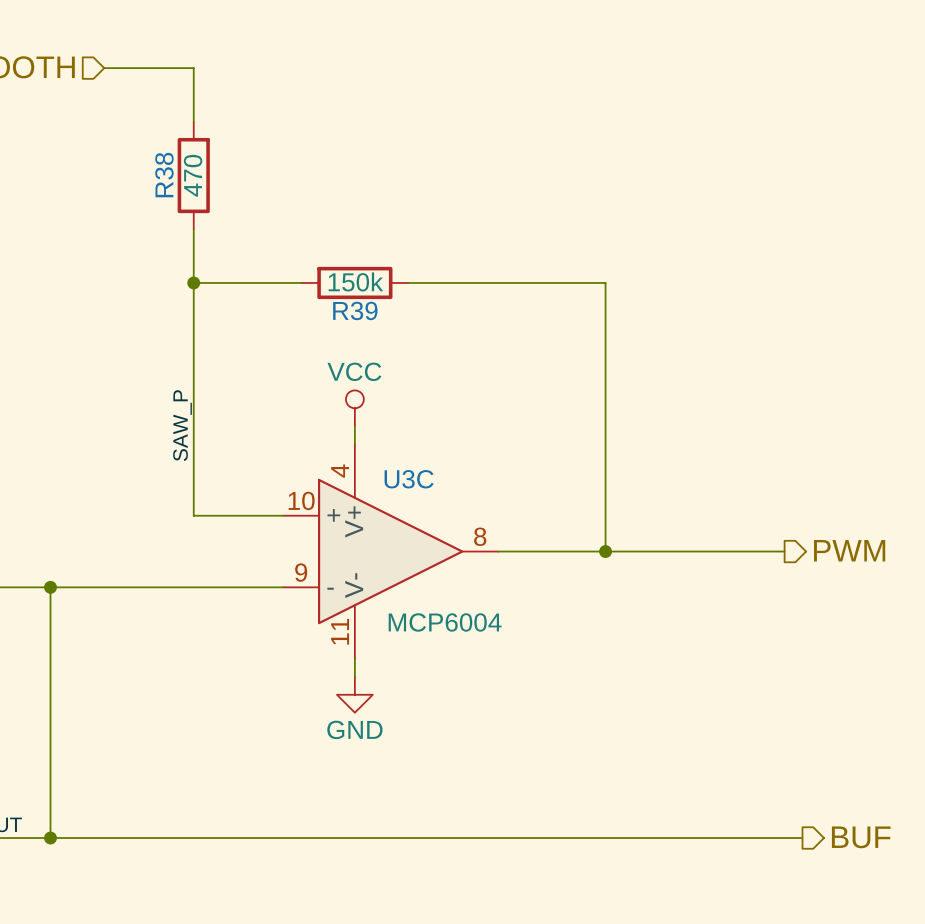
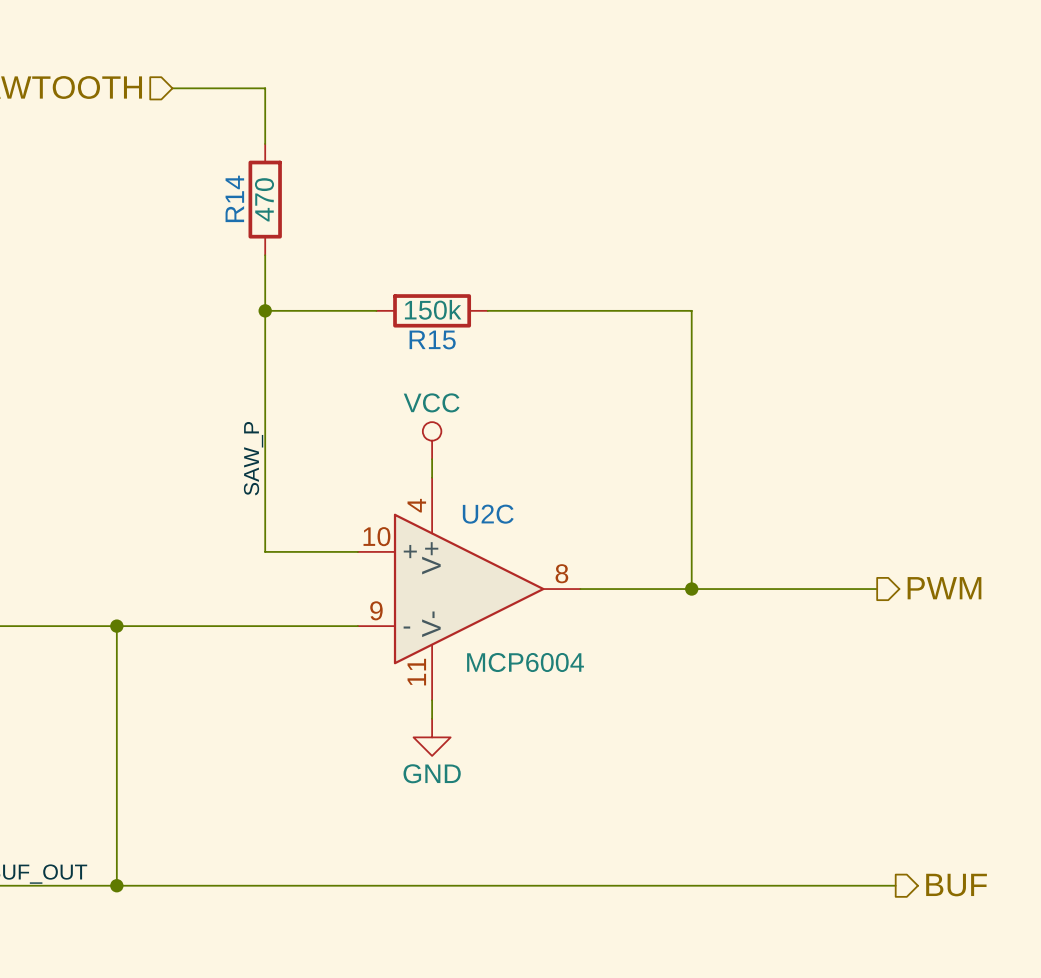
R38 name: R38 (164, 175) -> R14 (234, 198)
R39 name: R39 (355, 310) -> R15 (432, 339)
U3C name: U3C (409, 479) -> U2C (488, 514)

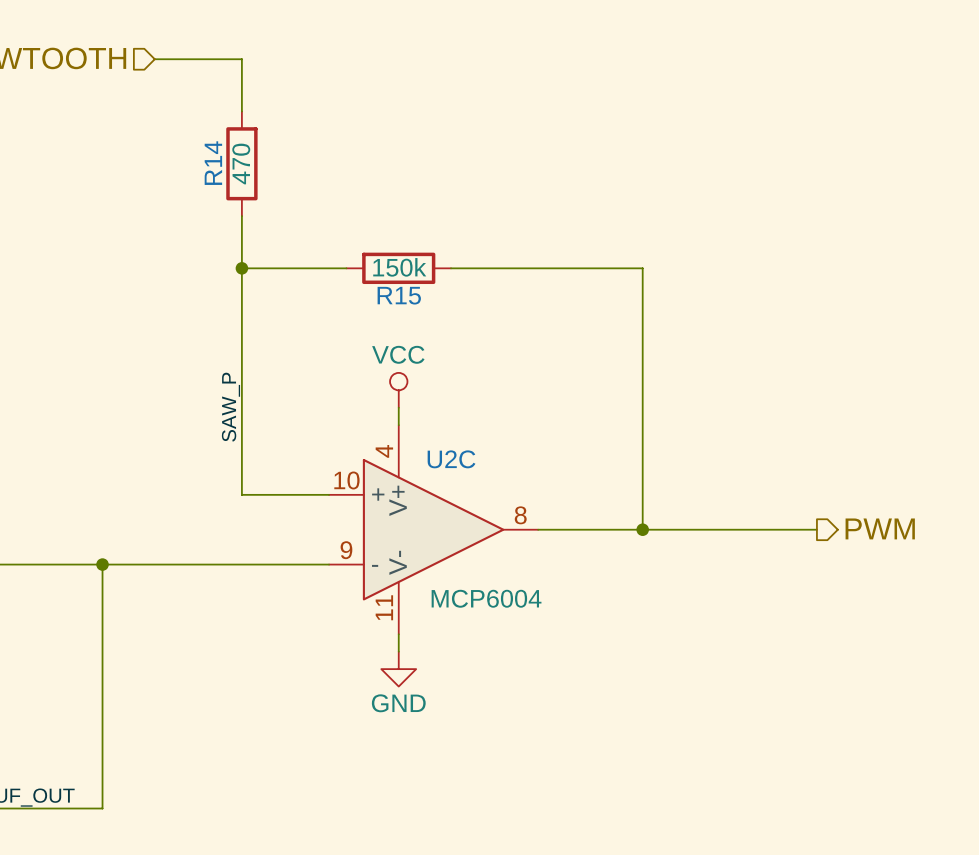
wire: (116, 885) (895, 885) -> none
junction: (116, 885) -> none
hierarchical label: BUF (956, 885) -> none

